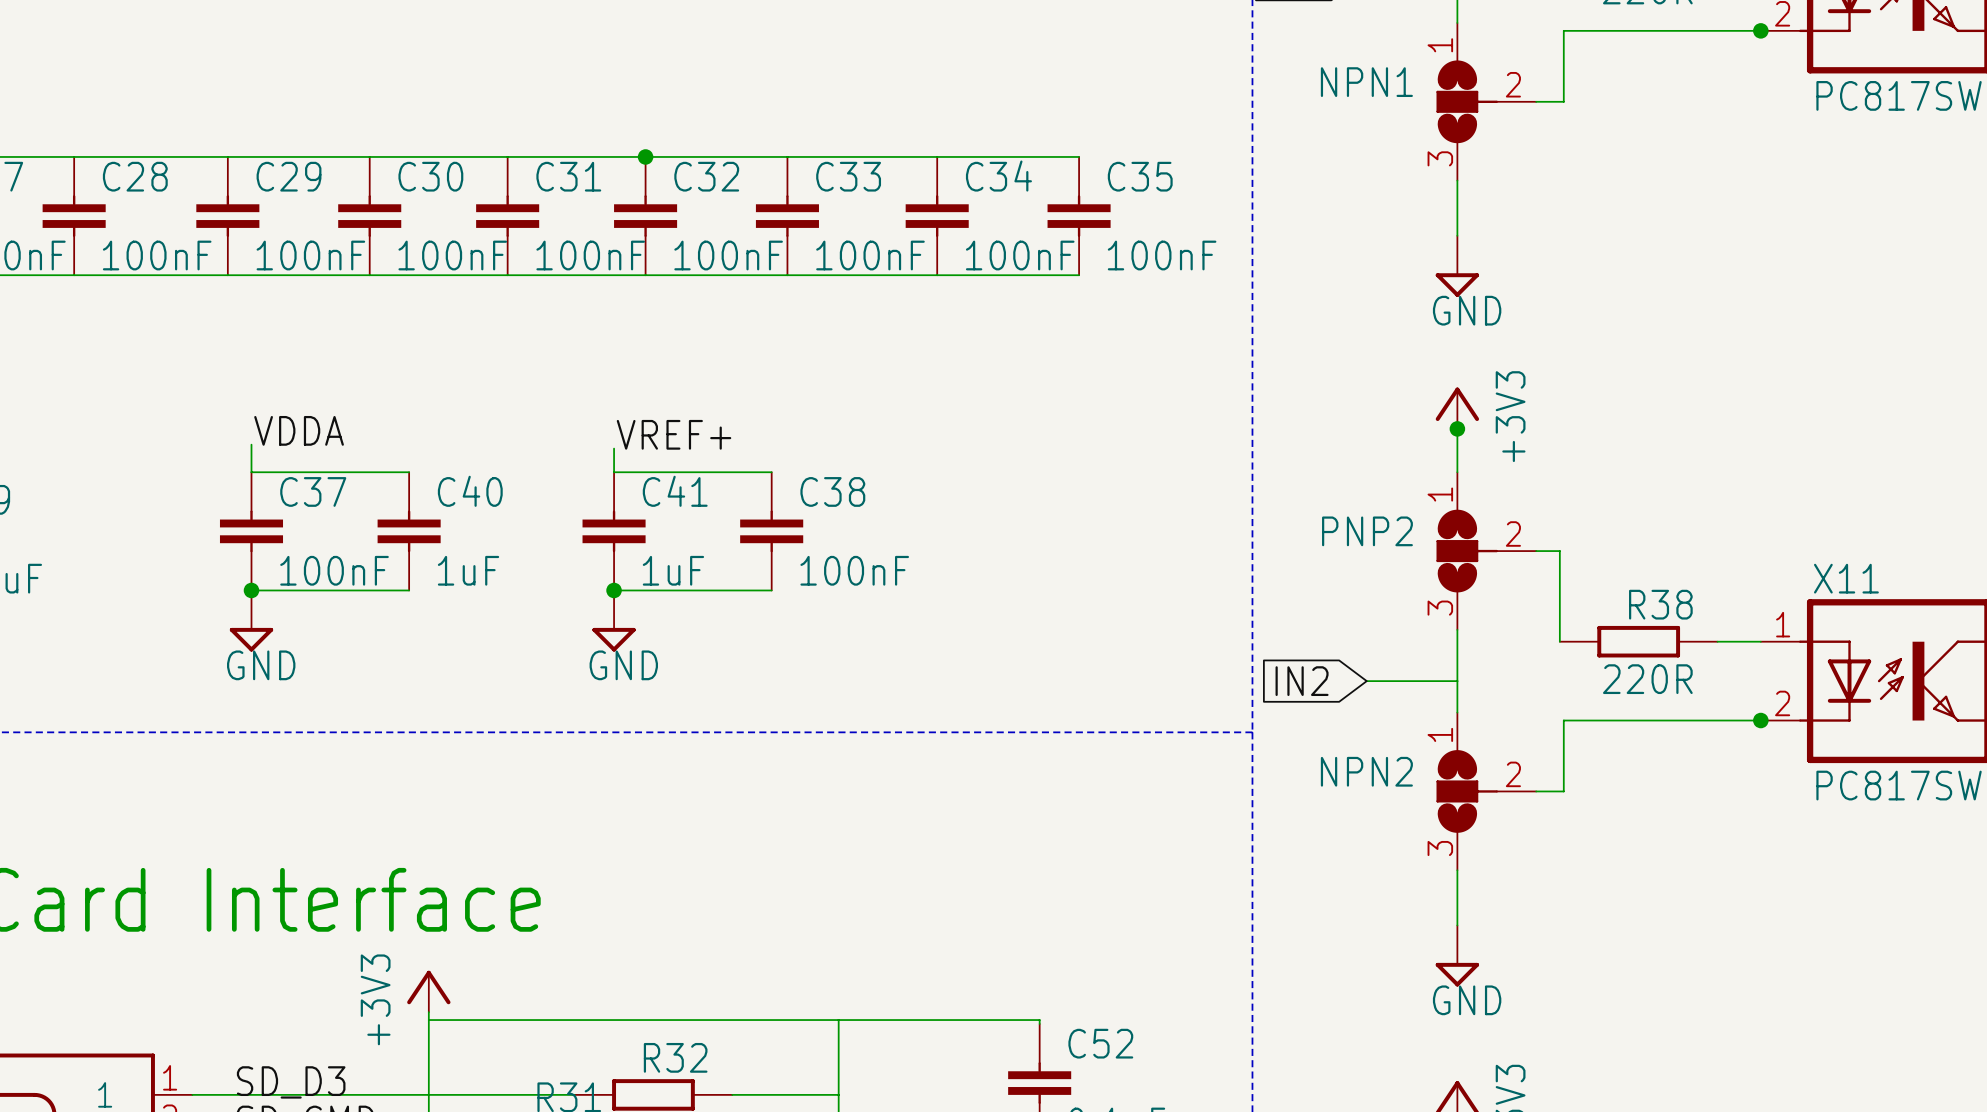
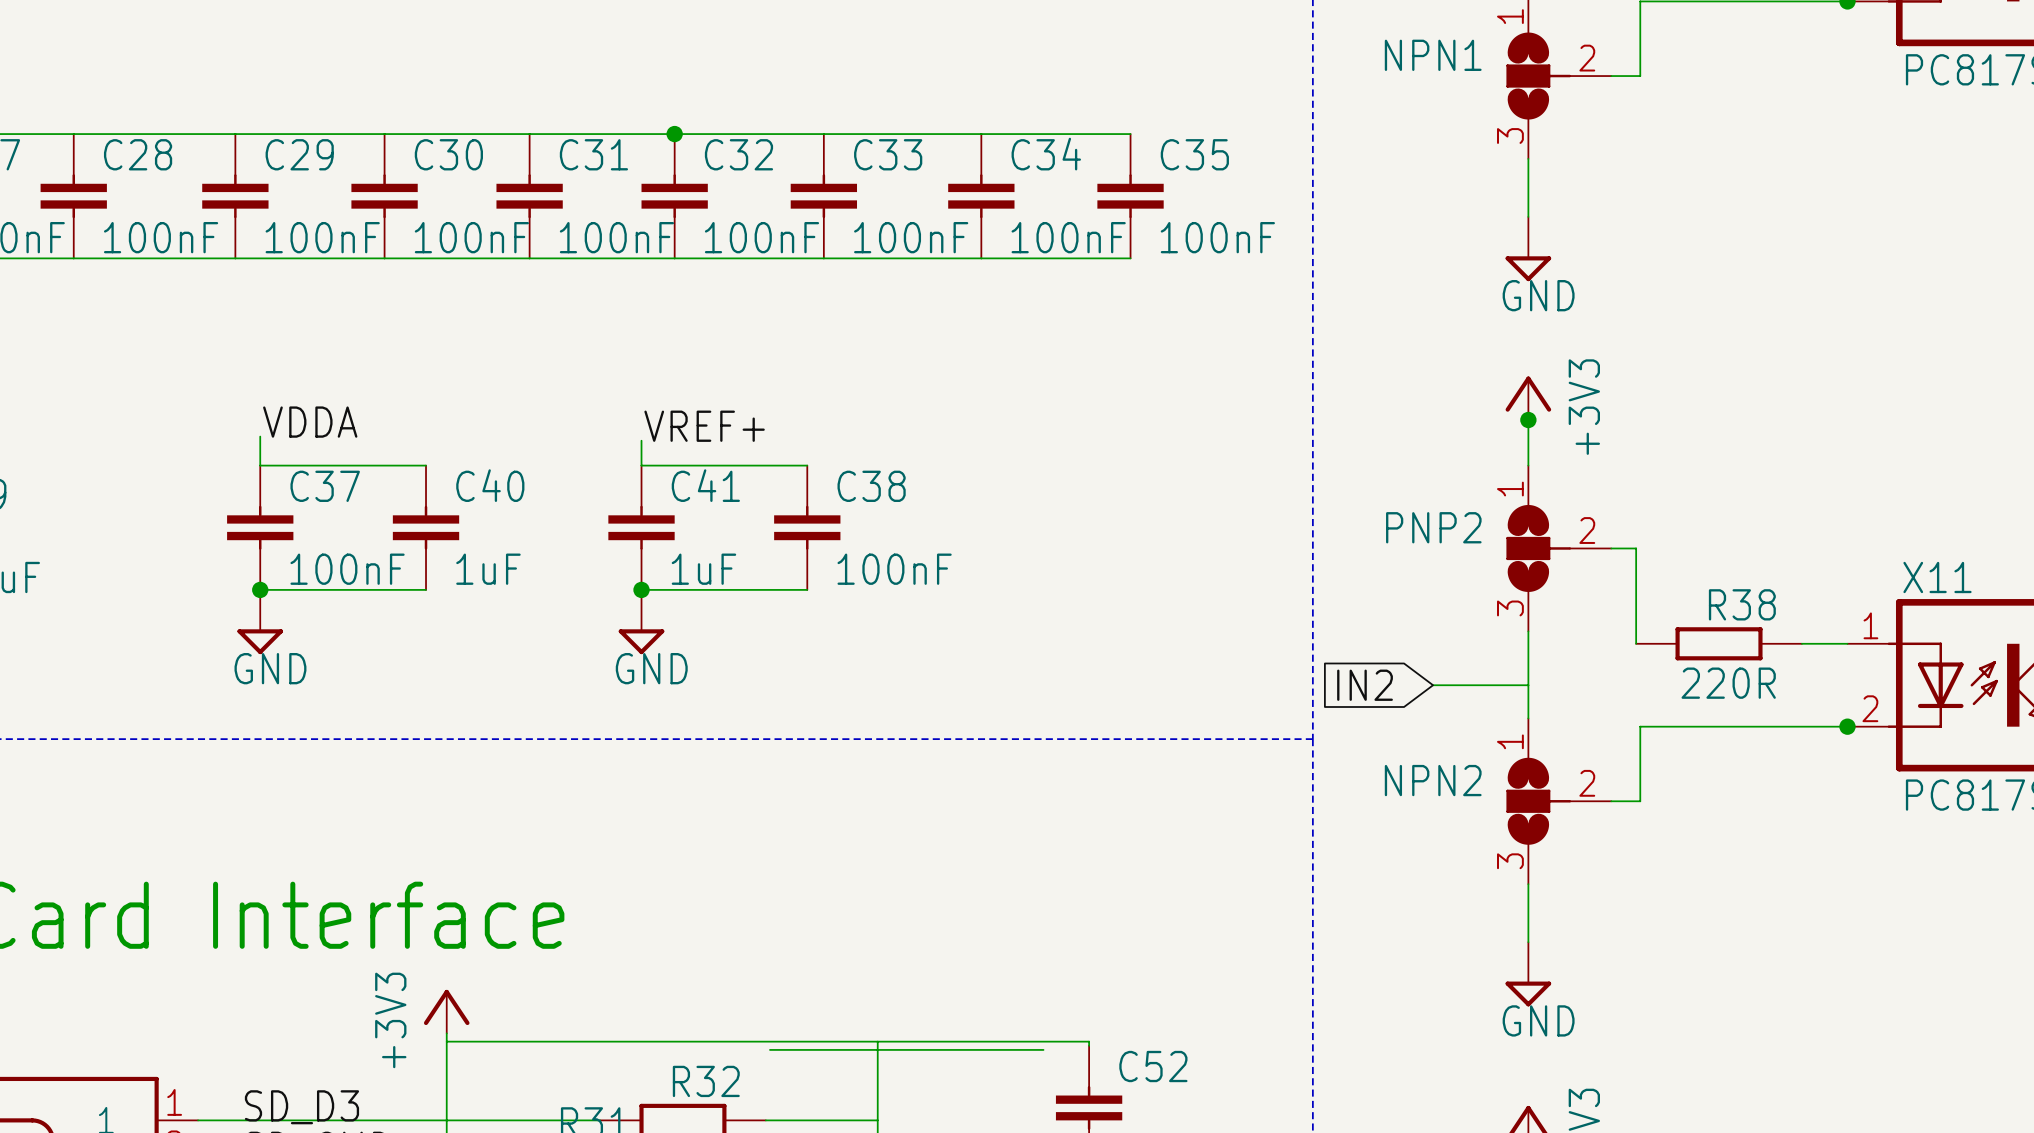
wire: none -> (769, 1049) (1043, 1049)

